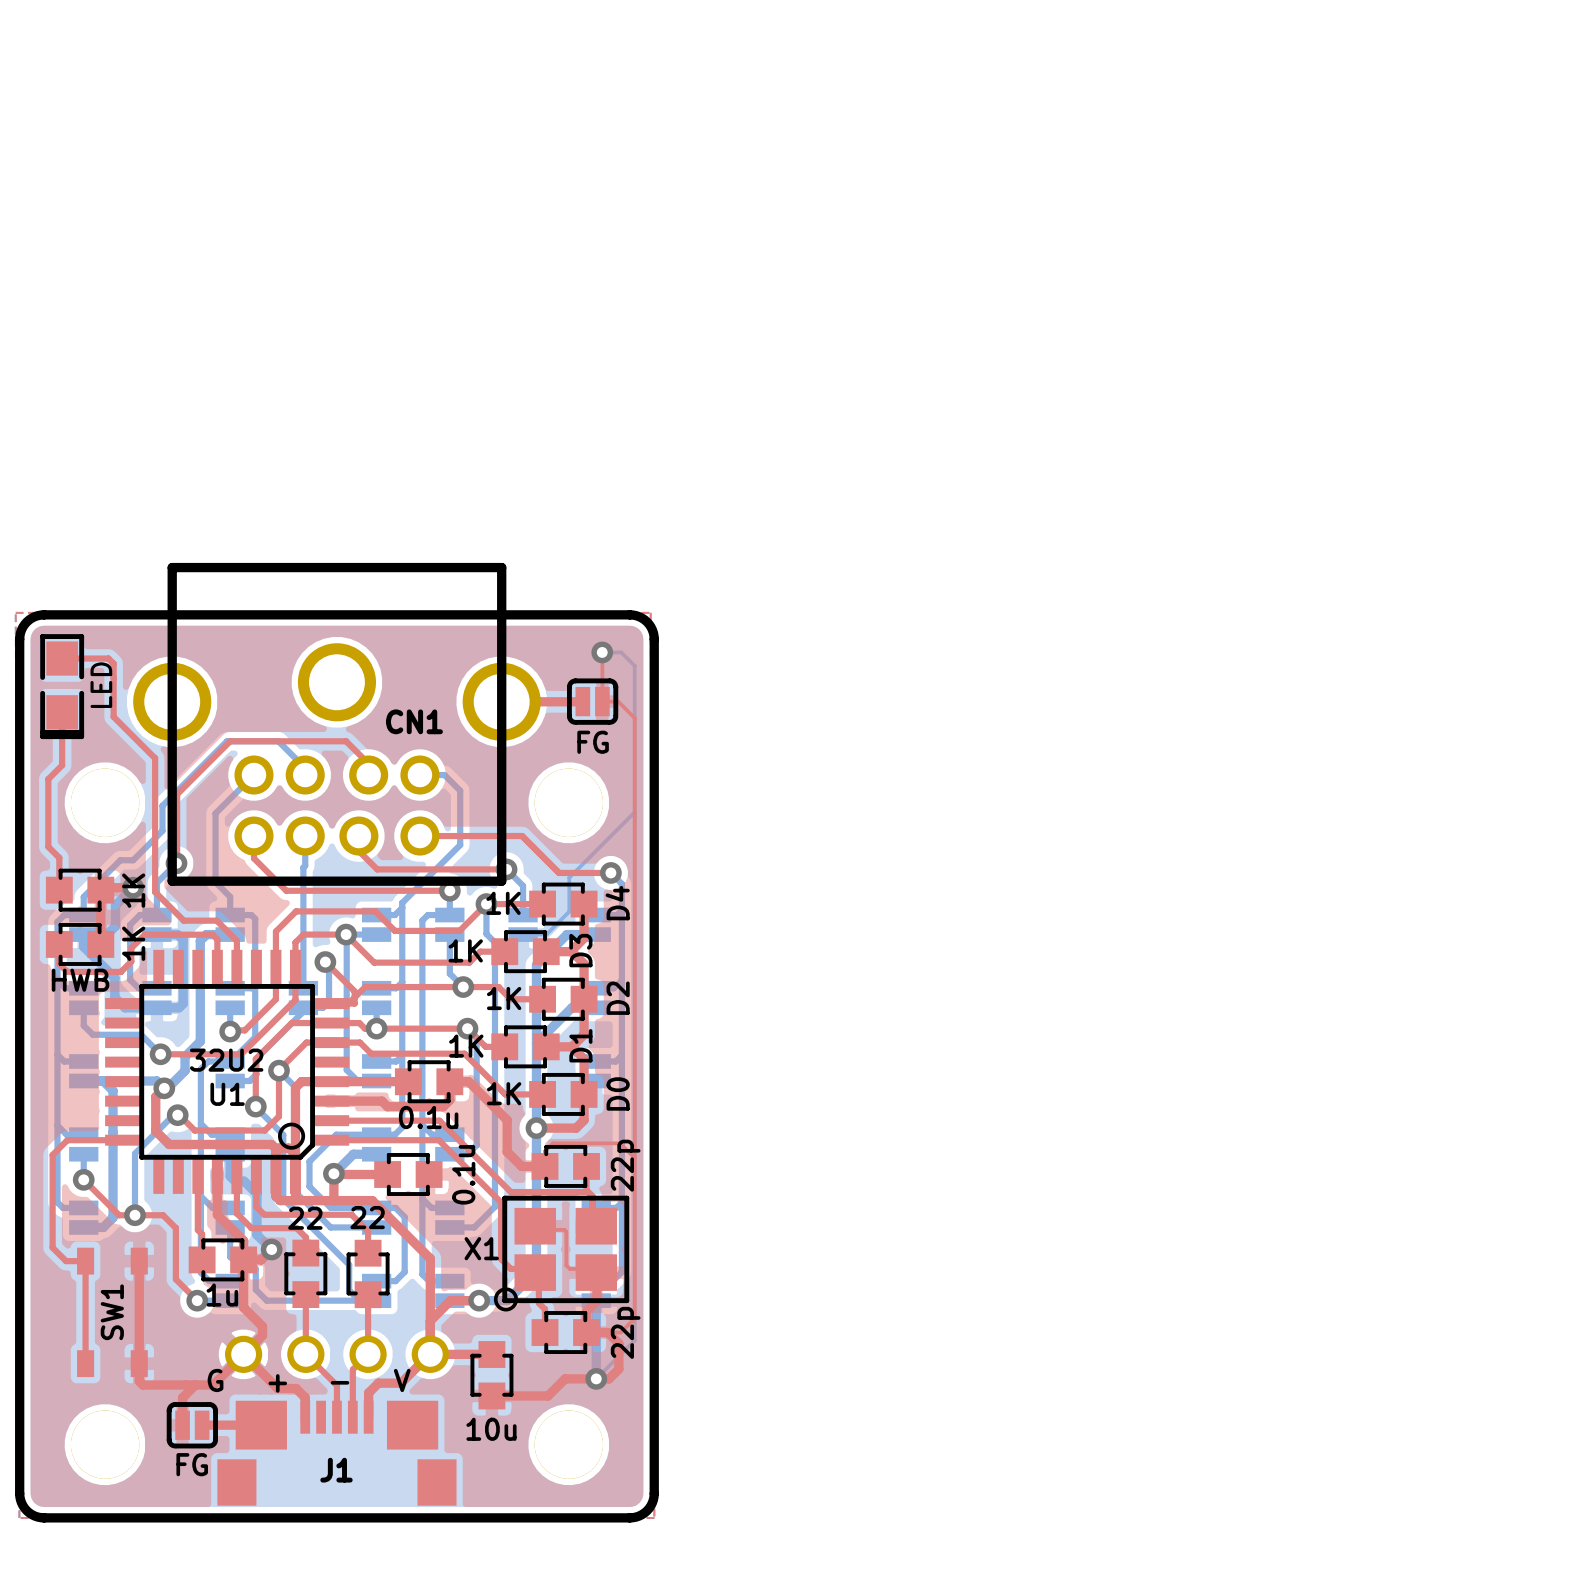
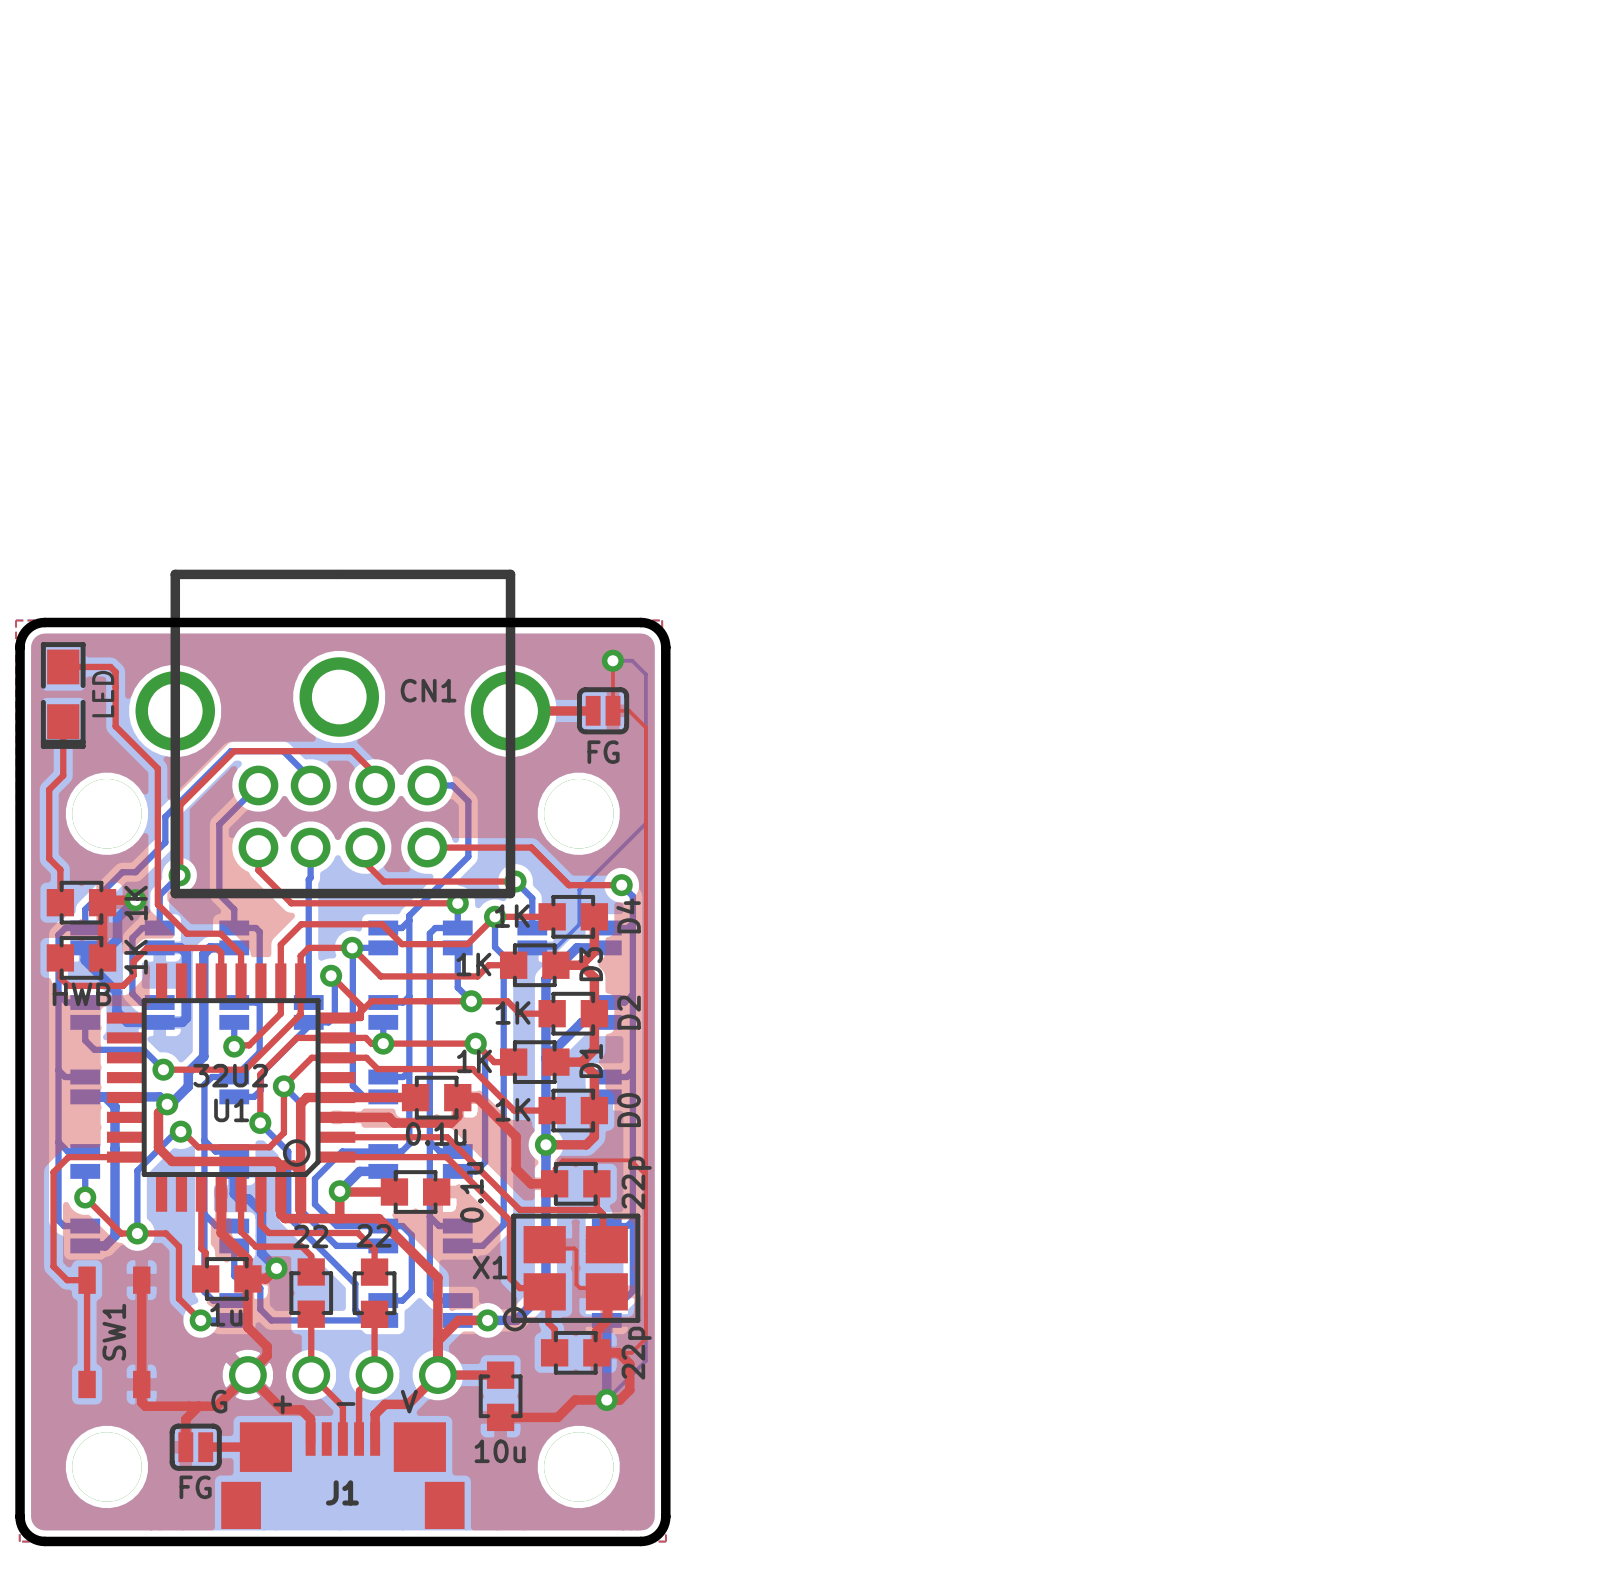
CN1 footprint: [133, 562, 541, 886] -> [135, 569, 551, 899]
CN1 name position: CN1 (414, 721) -> CN1 (428, 690)

